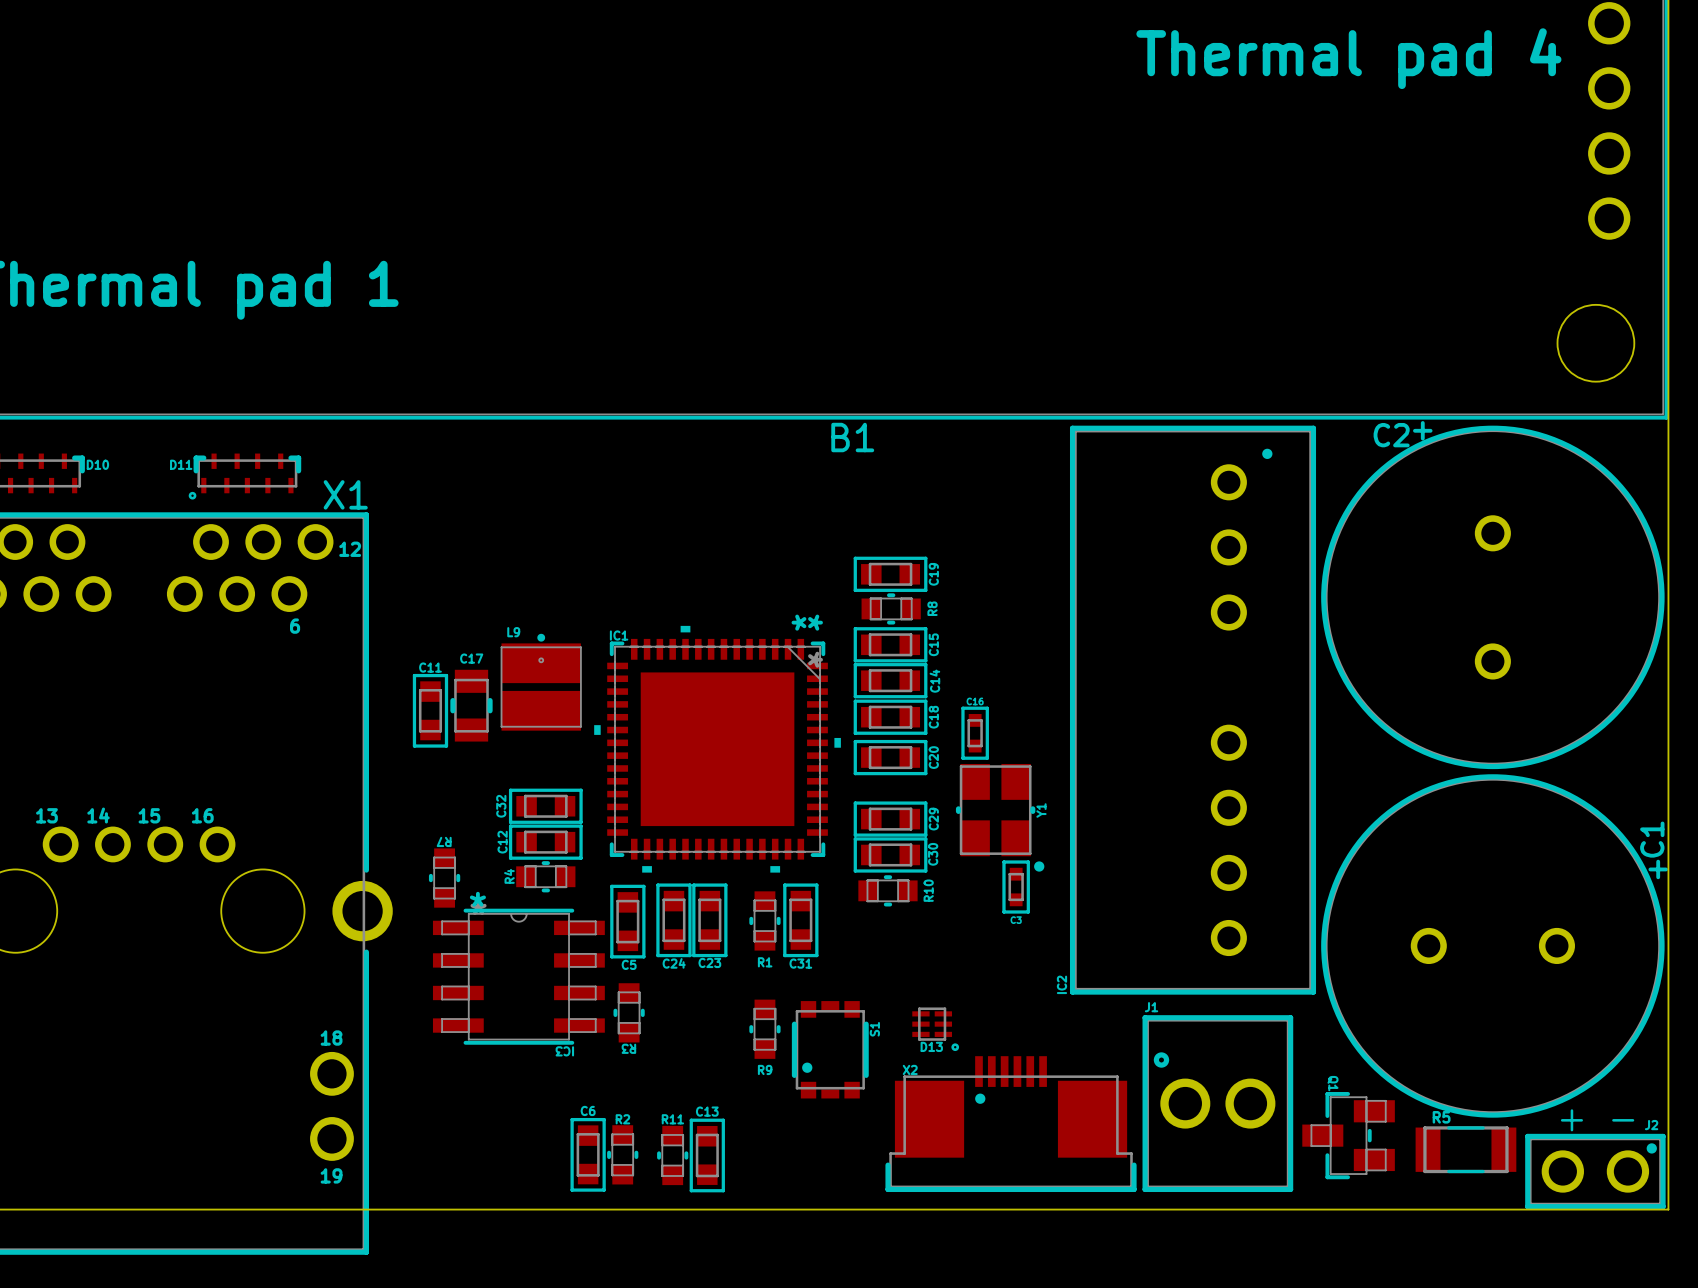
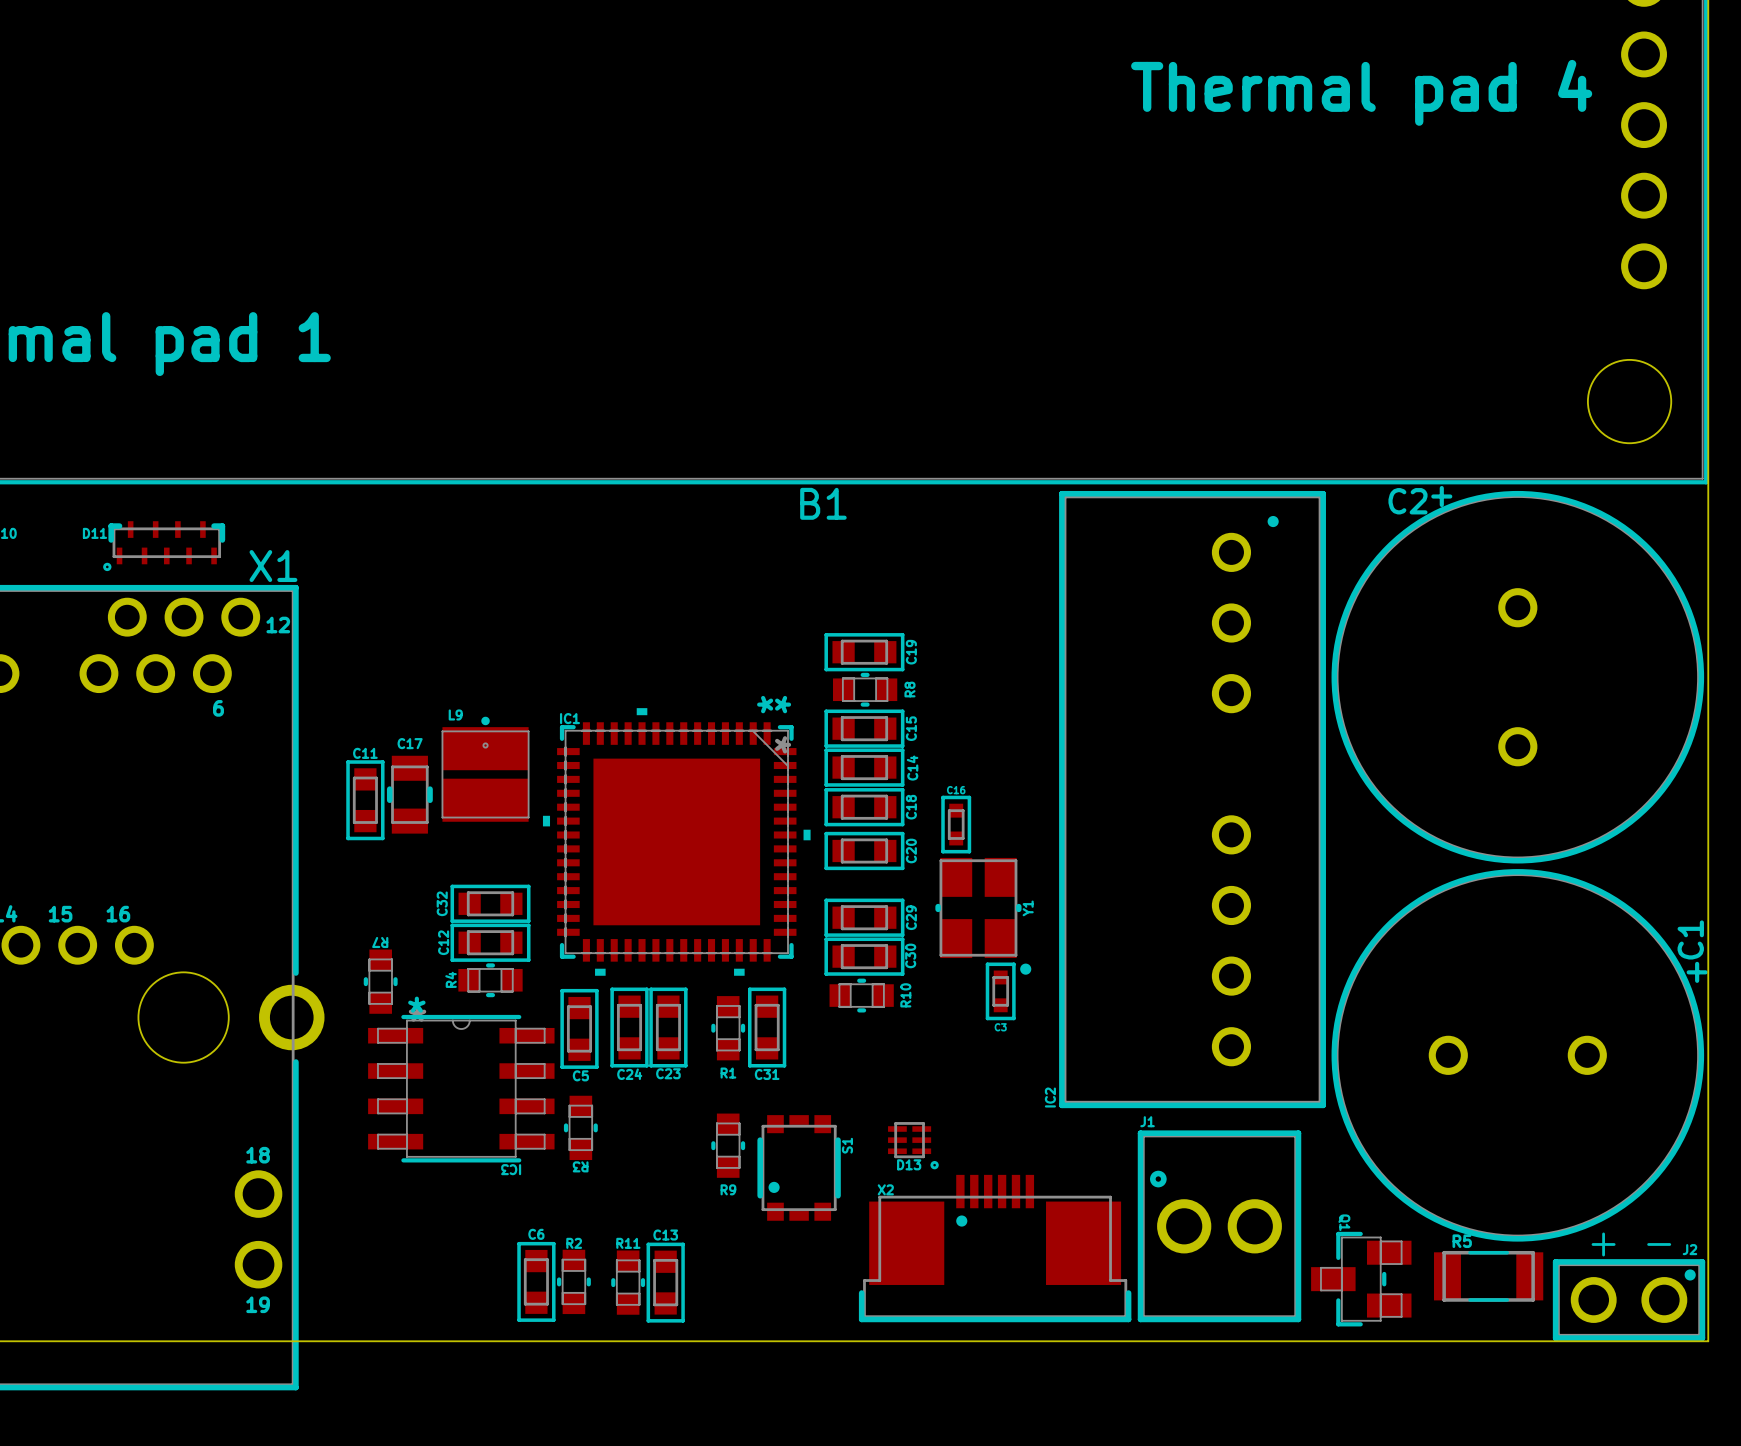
Q1 position: (1348, 1135) -> (1361, 1279)

